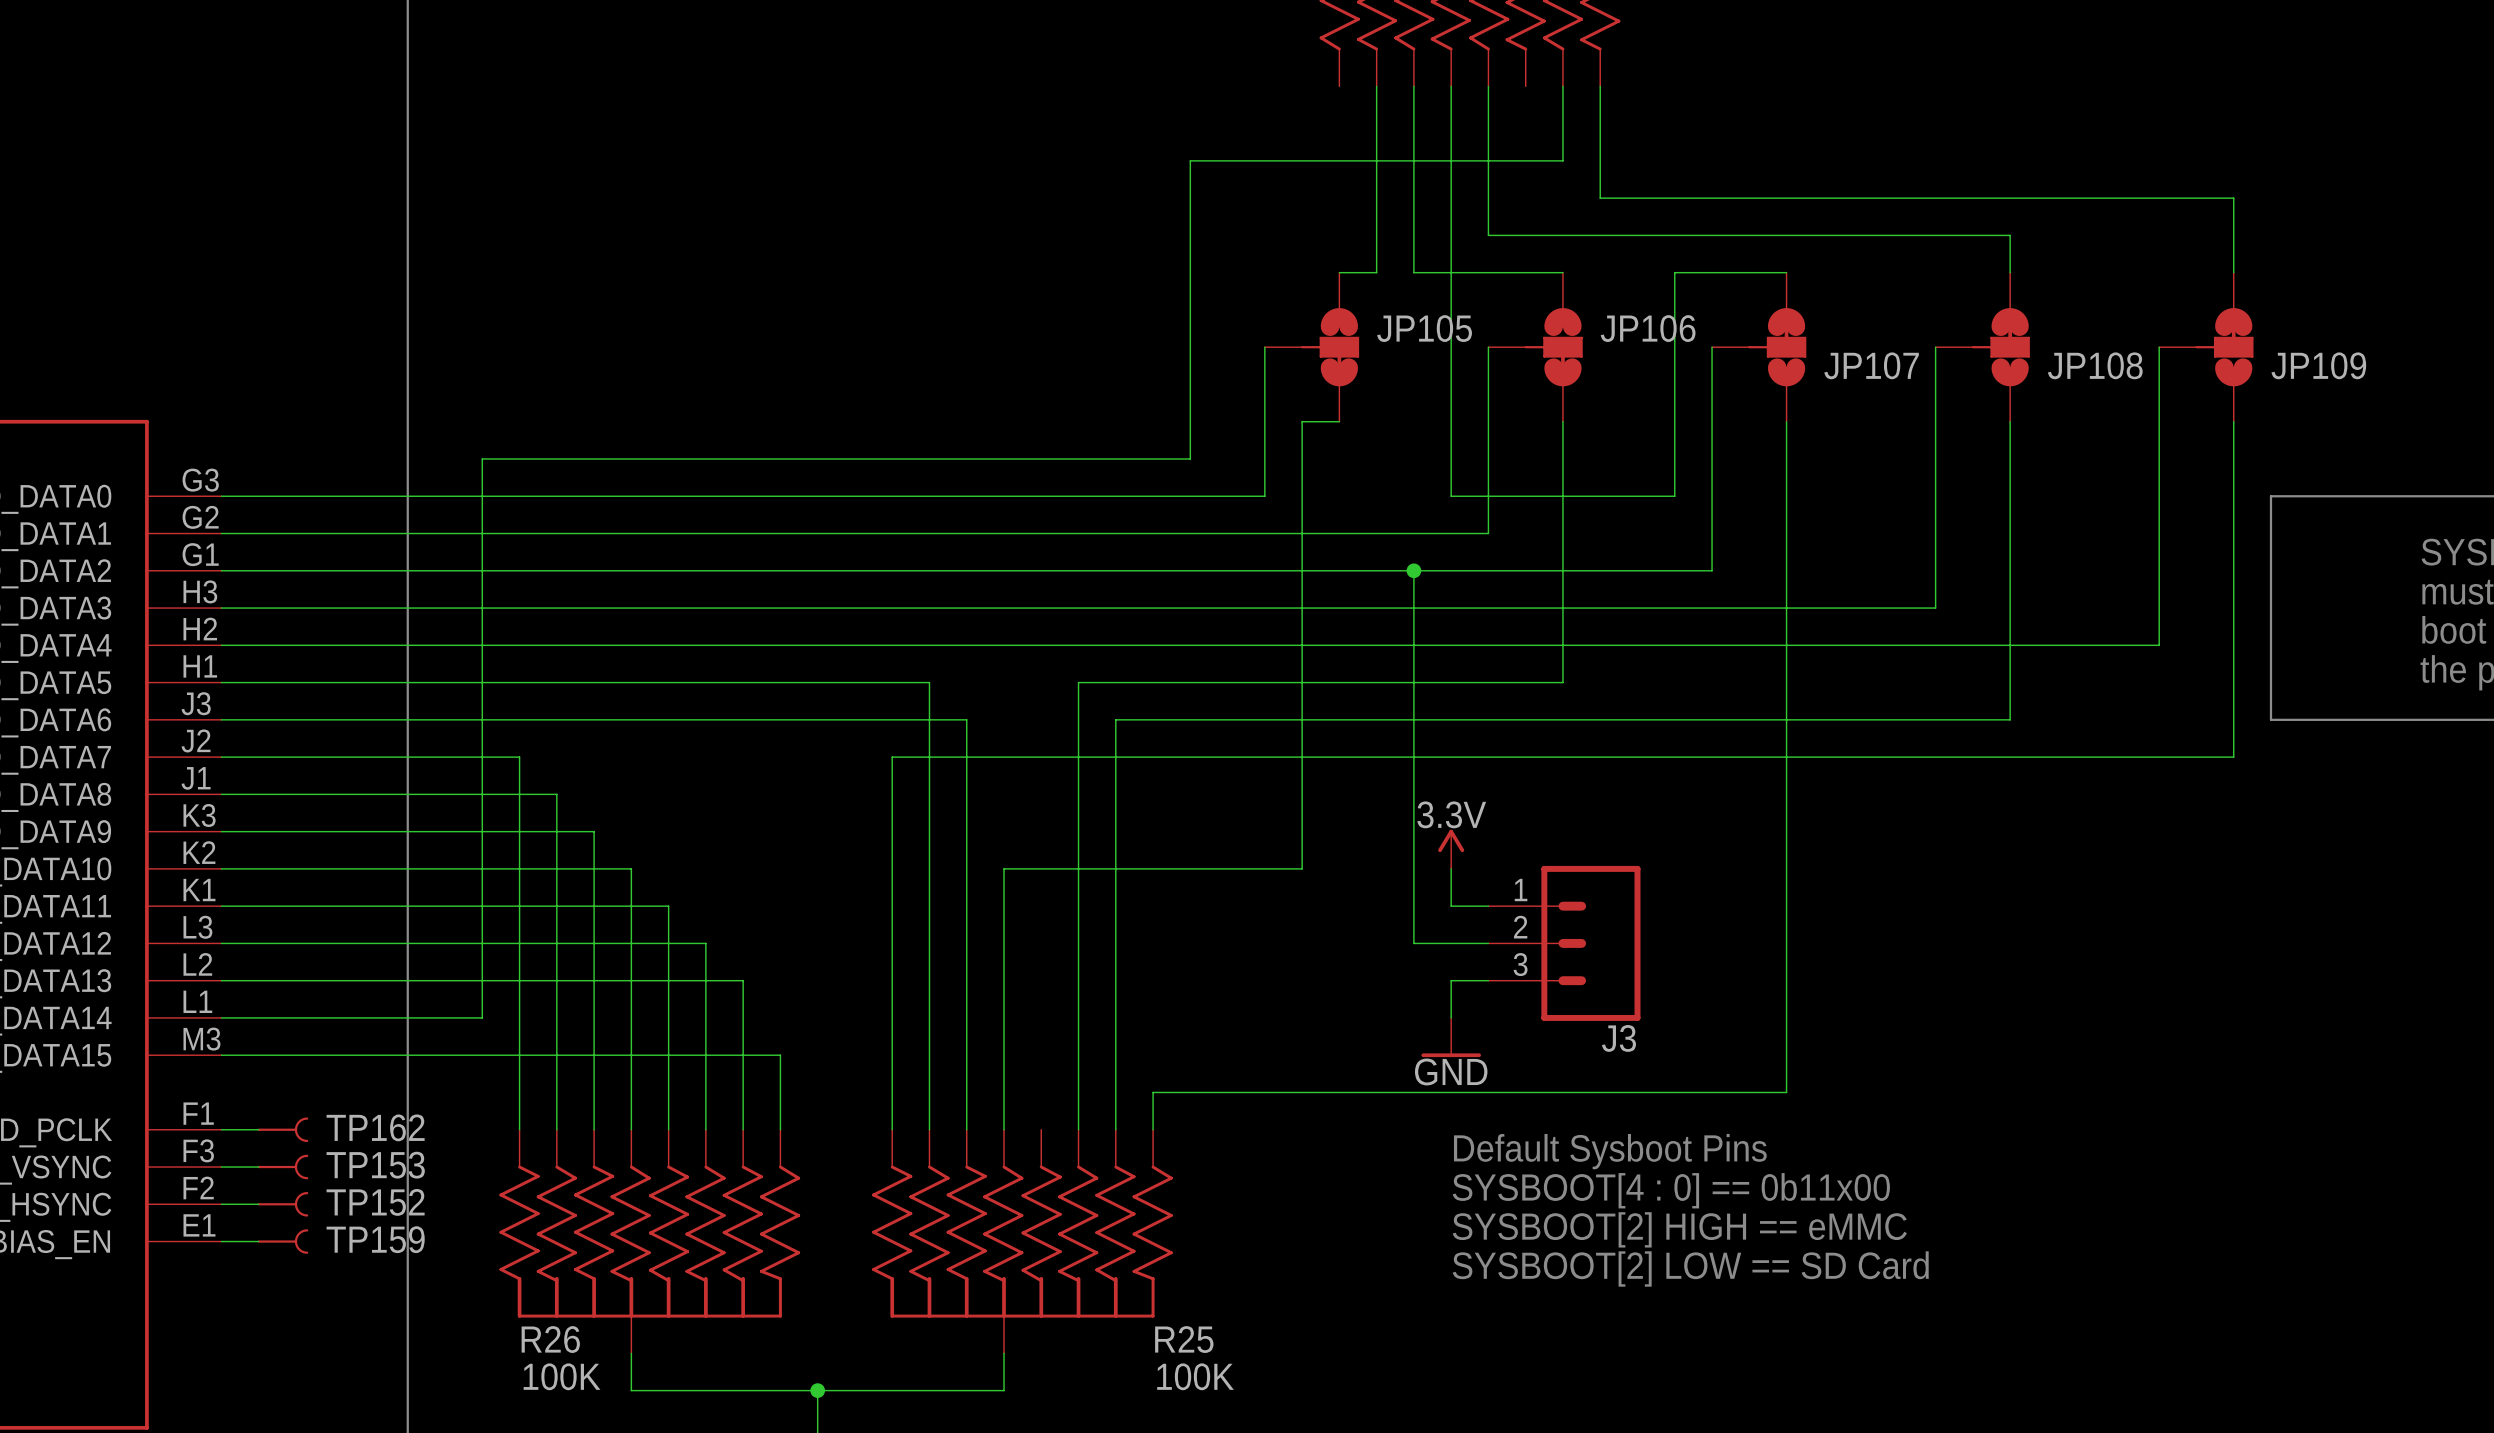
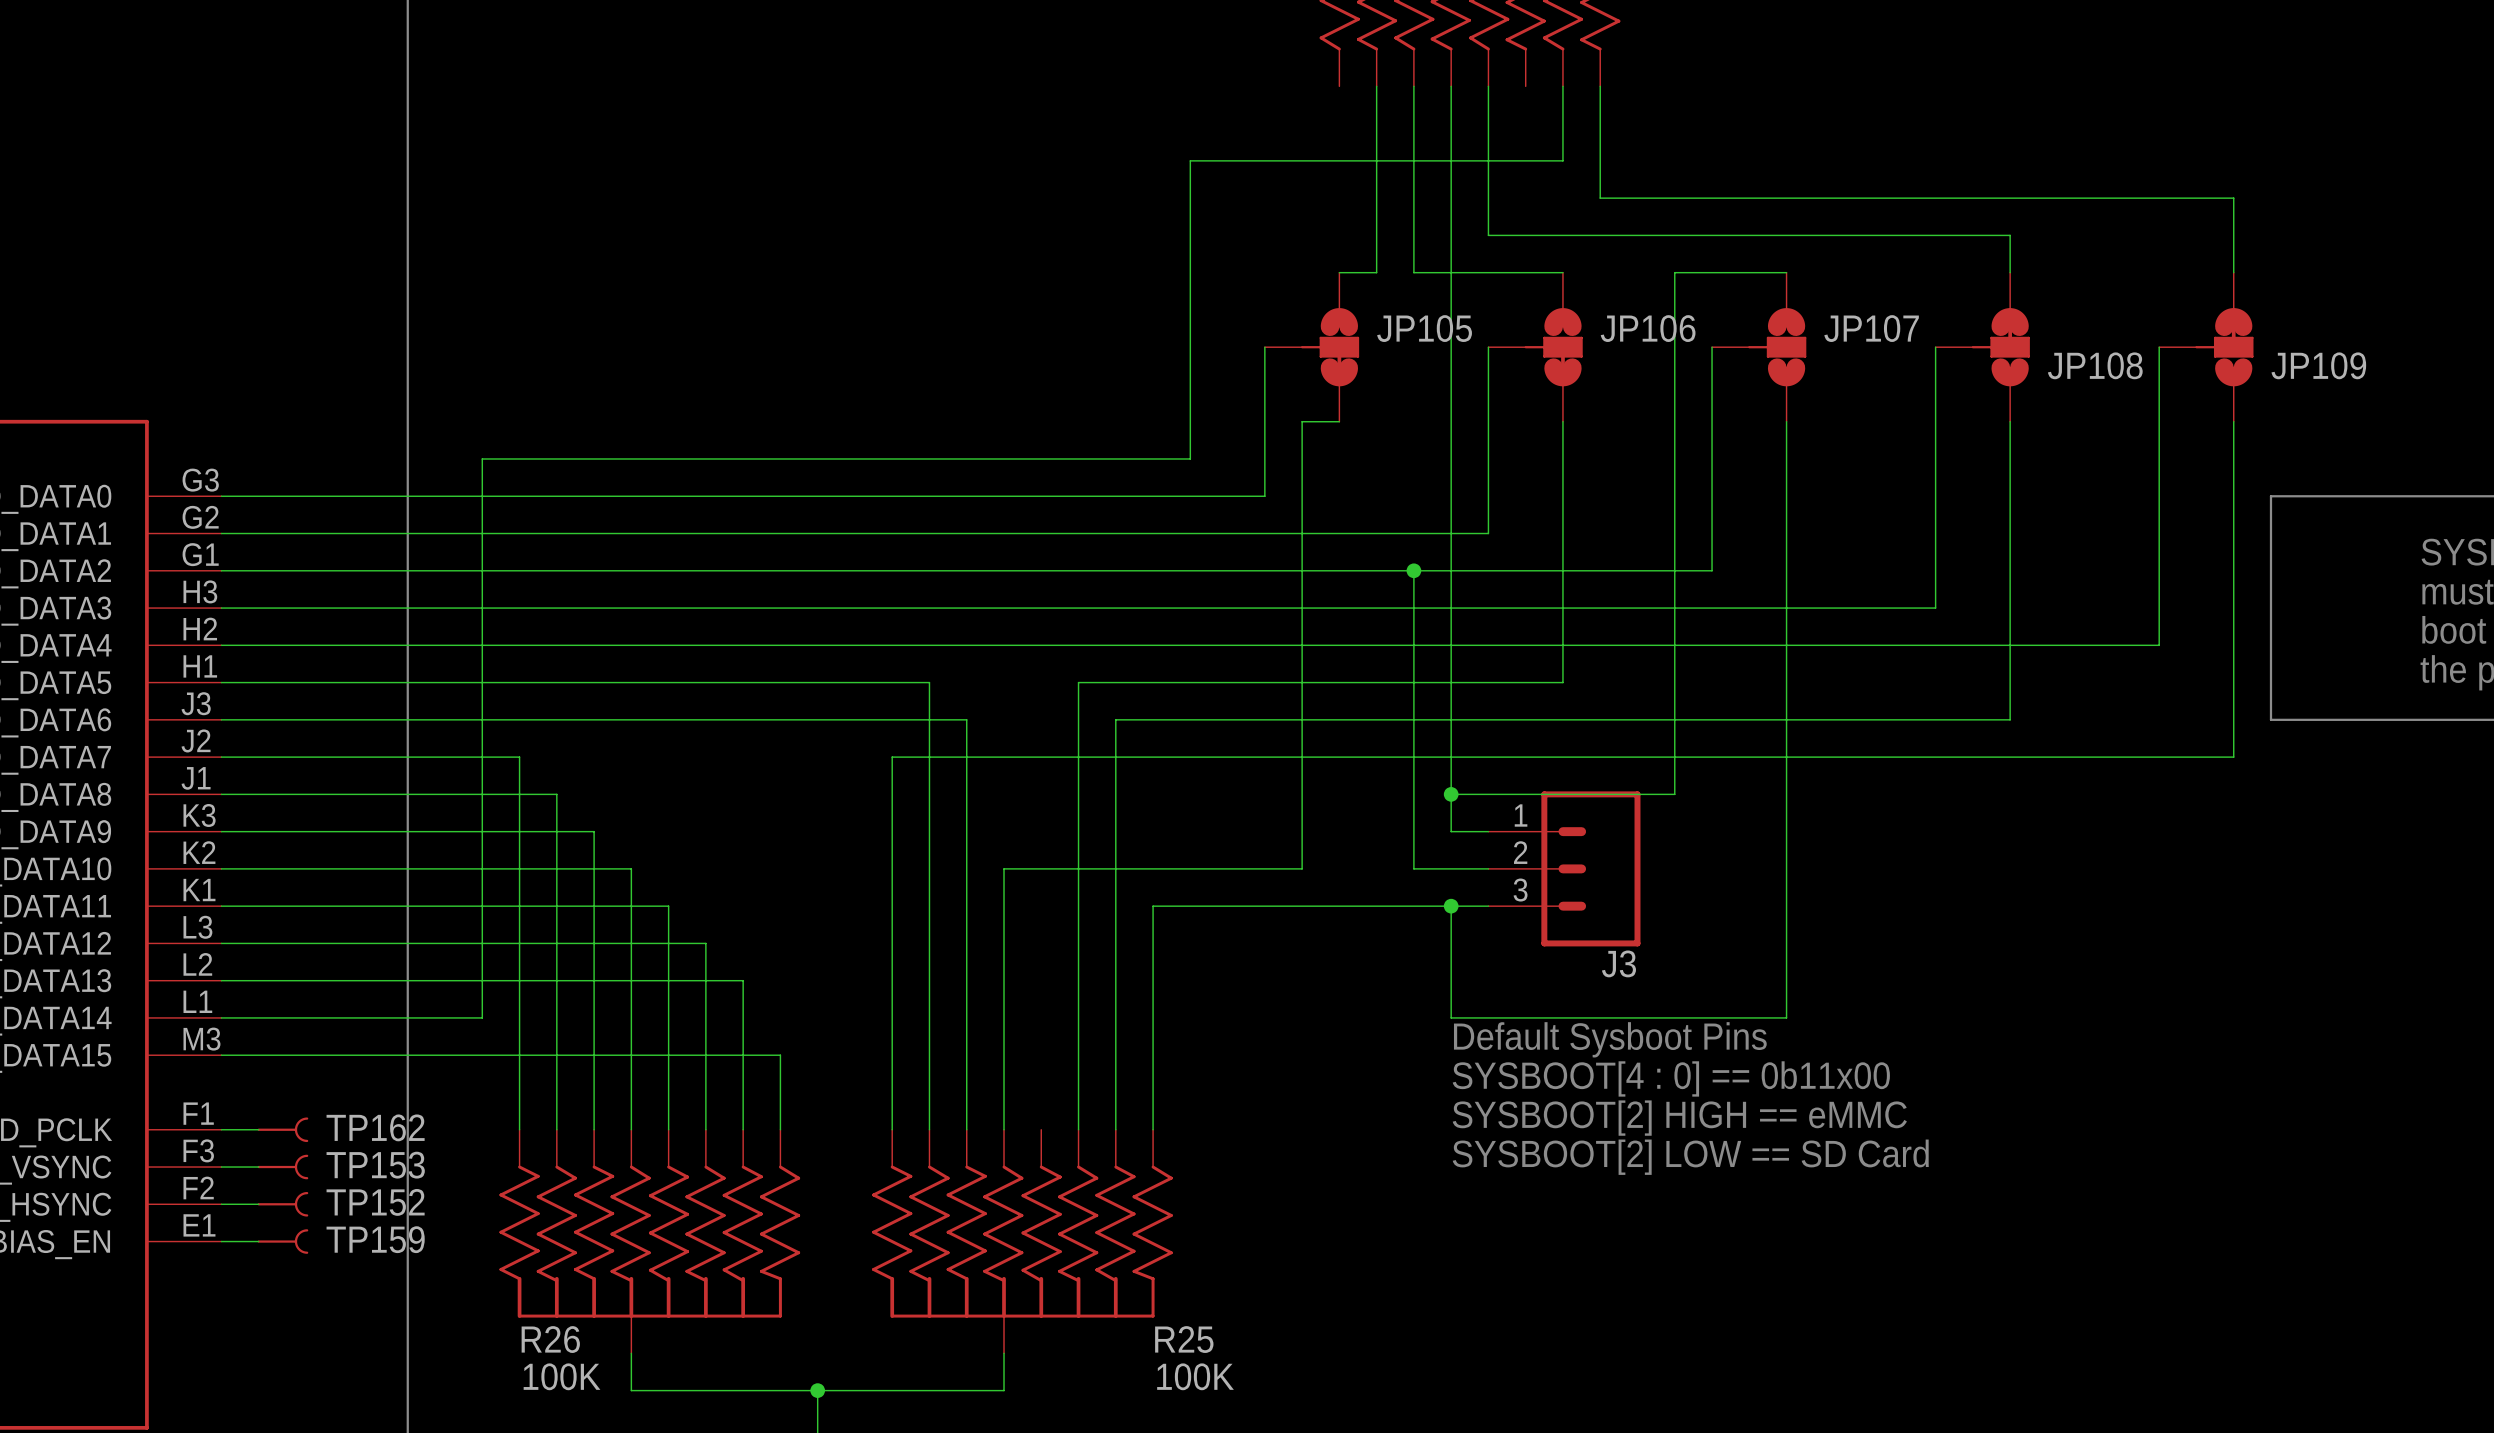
JP107 symbol: [1712, 272, 1807, 422] -> [1712, 272, 1807, 422]
JP107 name position: JP107 (1871, 365) -> JP107 (1871, 328)
wire: (1451, 496) (1674, 496) -> (1451, 794) (1674, 794) (1674, 496)
wire: none -> (1451, 496) (1451, 831) (1488, 831)
junction: none -> (1451, 794)
power symbol: 3.3V (1451, 849) -> none
wire: (1413, 868) (1413, 943) (1488, 943) -> (1413, 868) (1488, 868)
wire: (1451, 868) (1451, 906) -> none
junction: none -> (1451, 906)
J3 position: (1564, 943) -> (1564, 868)
wire: (1451, 980) (1488, 980) -> (1451, 980) (1451, 906) (1153, 906) (1153, 1092)
wire: (1786, 1017) (1786, 1092) (1153, 1092) -> (1786, 1017) (1451, 1017)
power symbol: GND (1451, 1037) -> none
text position: Default Sysboot Pins (1610, 1151) -> Default Sysboot Pins (1610, 1039)
text position: SYSBOOT[4 : 0] == 0b11x00 (1671, 1190) -> SYSBOOT[4 : 0] == 0b11x00 (1671, 1078)
text position: SYSBOOT[2] HIGH == eMMC (1679, 1229) -> SYSBOOT[2] HIGH == eMMC (1679, 1118)
text position: SYSBOOT[2] LOW == SD Card (1690, 1269) -> SYSBOOT[2] LOW == SD Card (1690, 1157)

